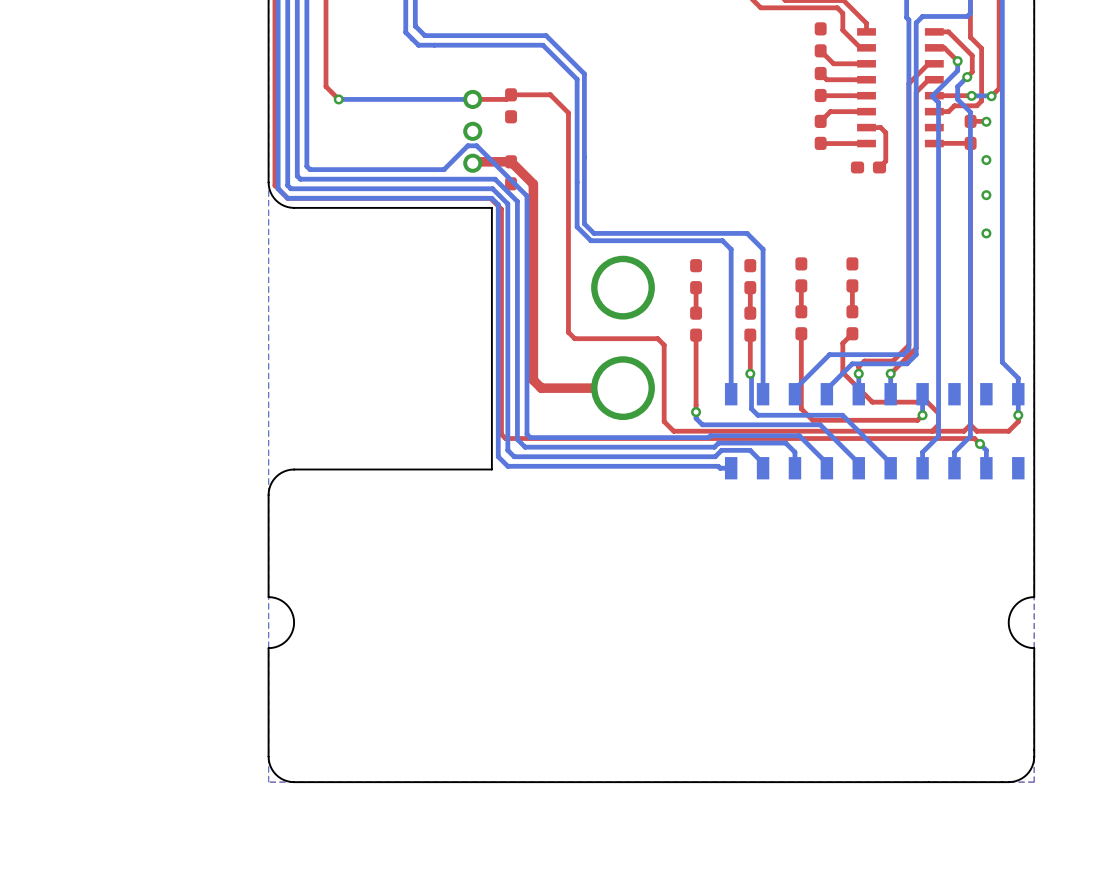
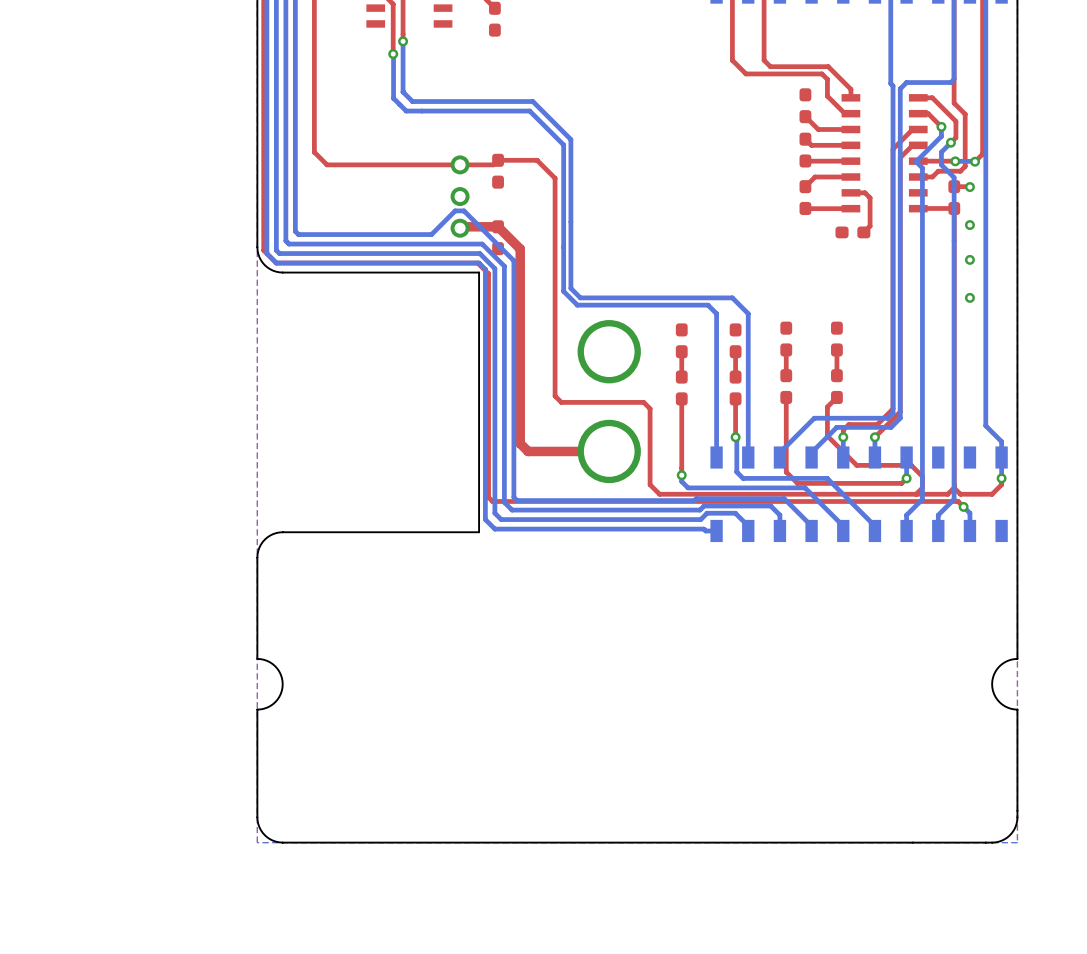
via: (338, 99) -> none
top track: none -> (460, 164) (327, 164)
bottom track: (472, 99) (338, 99) -> none

